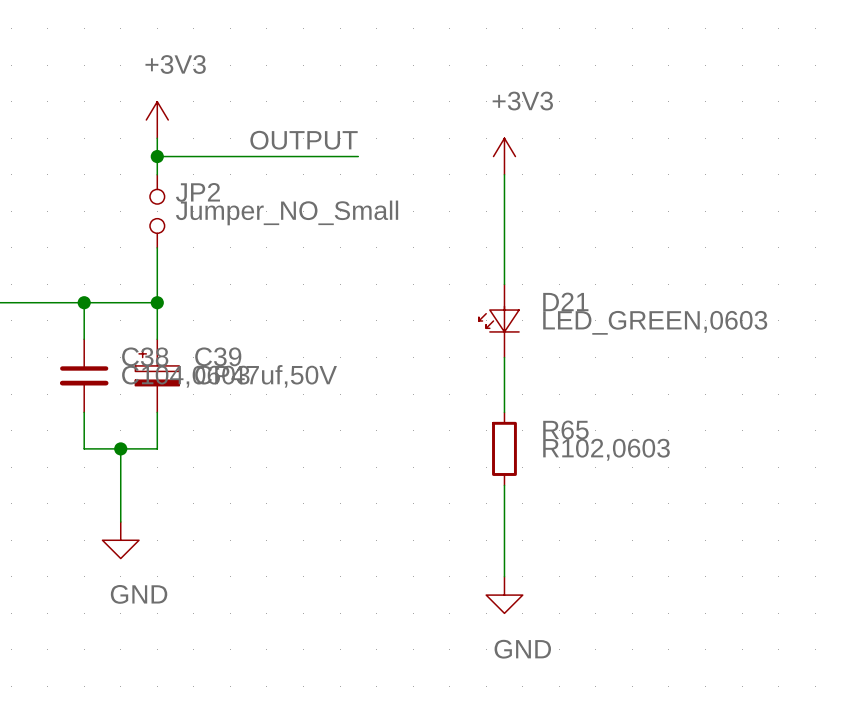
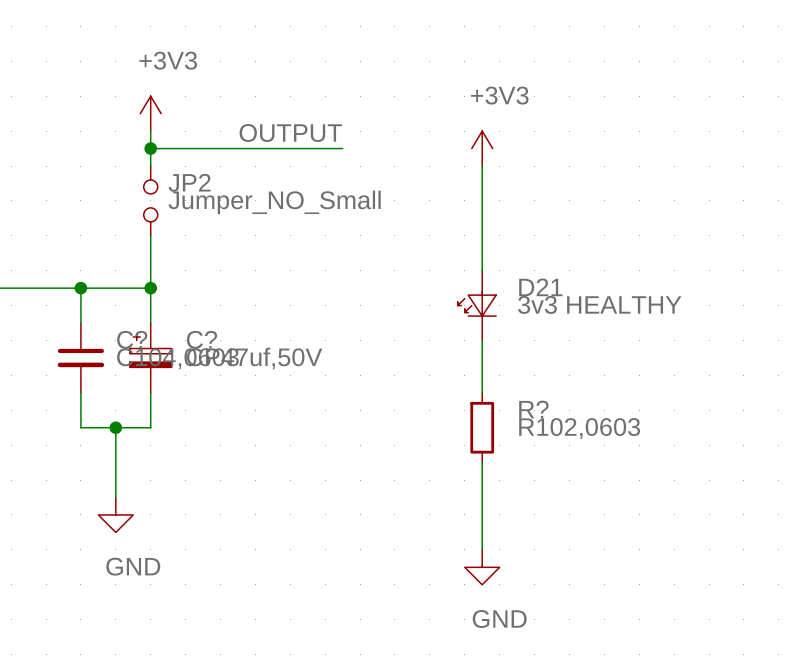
D21 value: LED_GREEN,0603 (655, 322) -> 3v3 HEALTHY (599, 304)
C38 name: C38 (145, 356) -> C? (132, 339)
C39 name: C39 (218, 356) -> C? (201, 339)
R65 name: R65 (565, 429) -> R? (533, 409)

